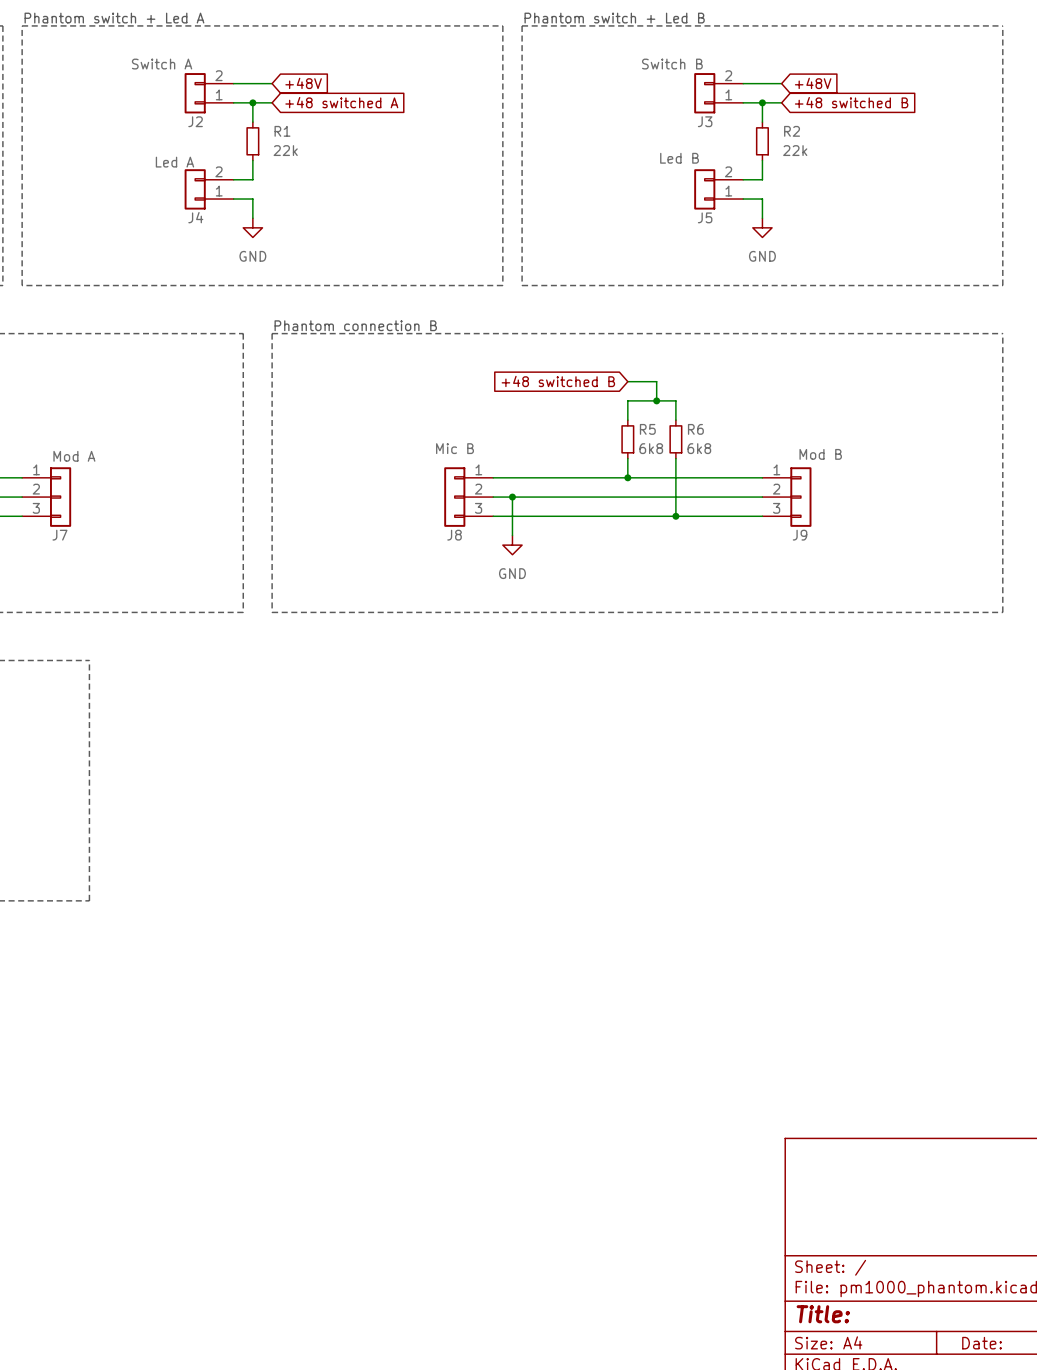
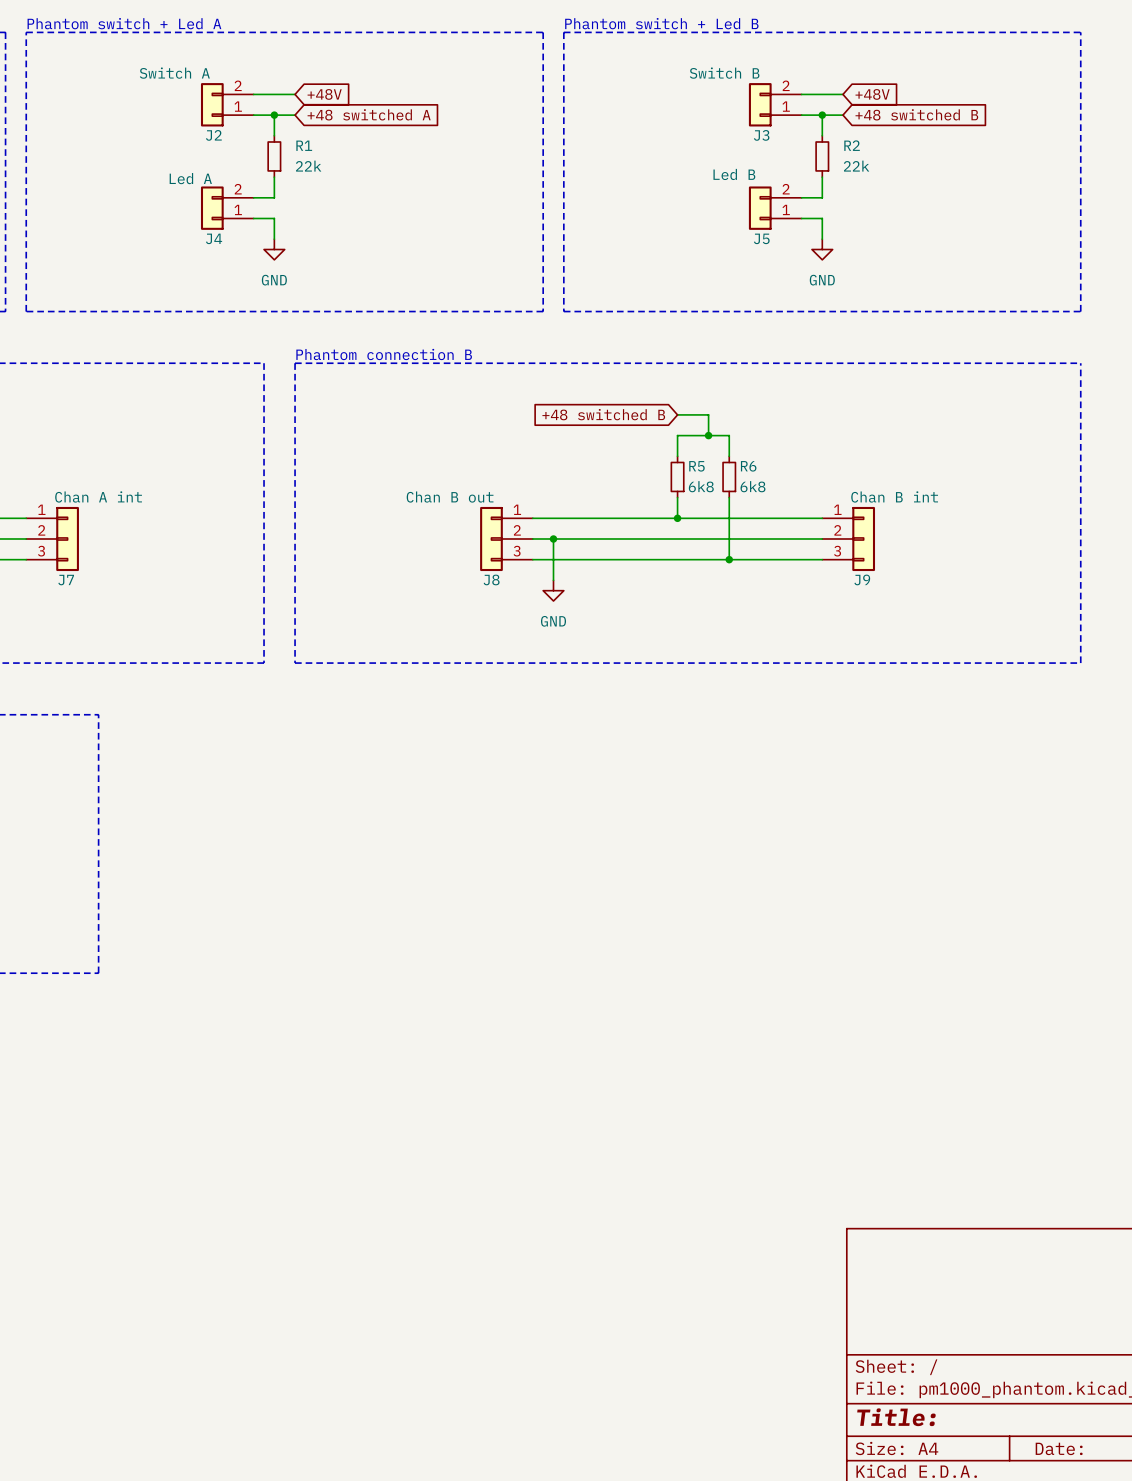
J8 value: Mic B (455, 448) -> none
J9 value: Mod B (820, 454) -> none
J7 value: Mod A (74, 456) -> none
J7 text: none -> Chan A int (98, 496)
J8 text: none -> Chan B out (450, 497)
J9 text: none -> Chan B int (894, 496)

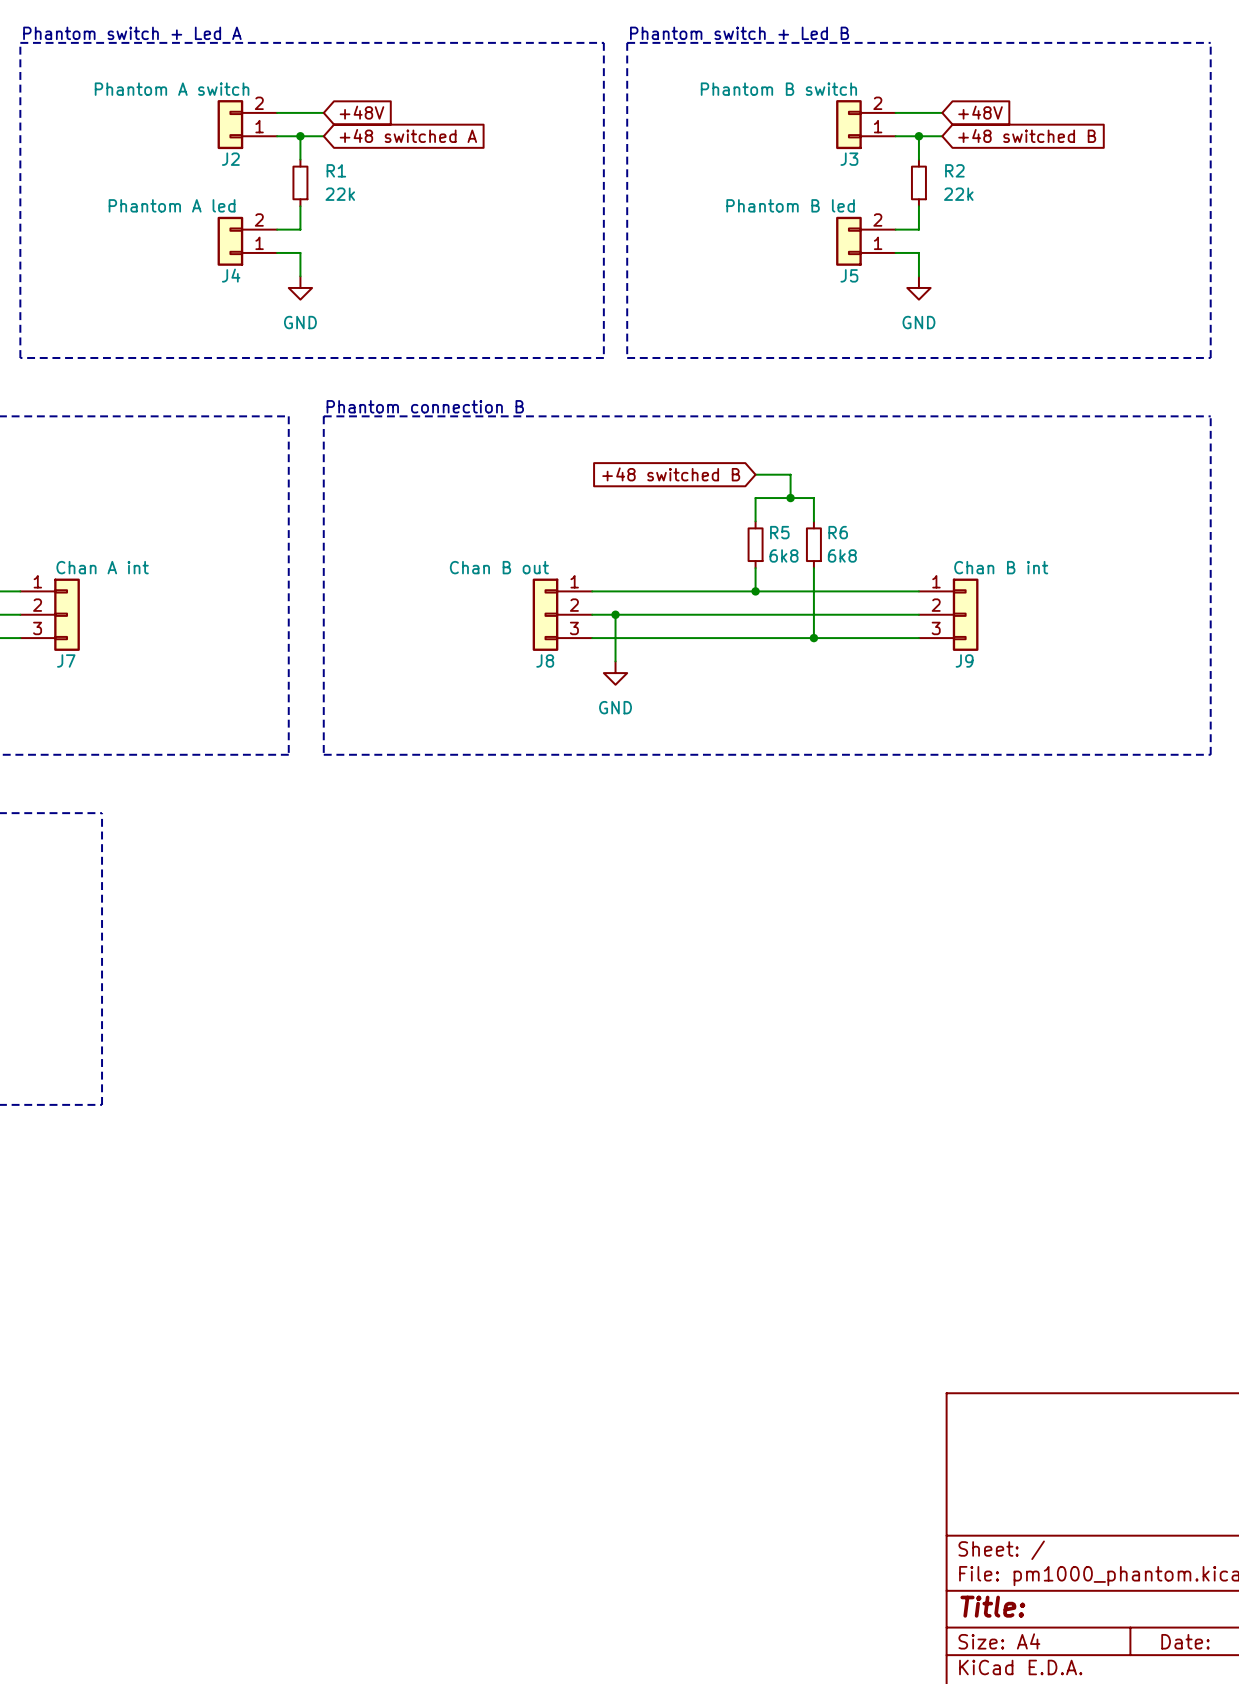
J2 text: none -> Phantom A switch (172, 89)
J2 value: Switch A (174, 73) -> none
J3 text: none -> Phantom B switch (778, 89)
J3 value: Switch B (724, 73) -> none
J5 value: Led B (734, 174) -> none
J4 text: none -> Phantom A led (172, 205)
J5 text: none -> Phantom B led (790, 205)
J4 value: Led A (190, 178) -> none

